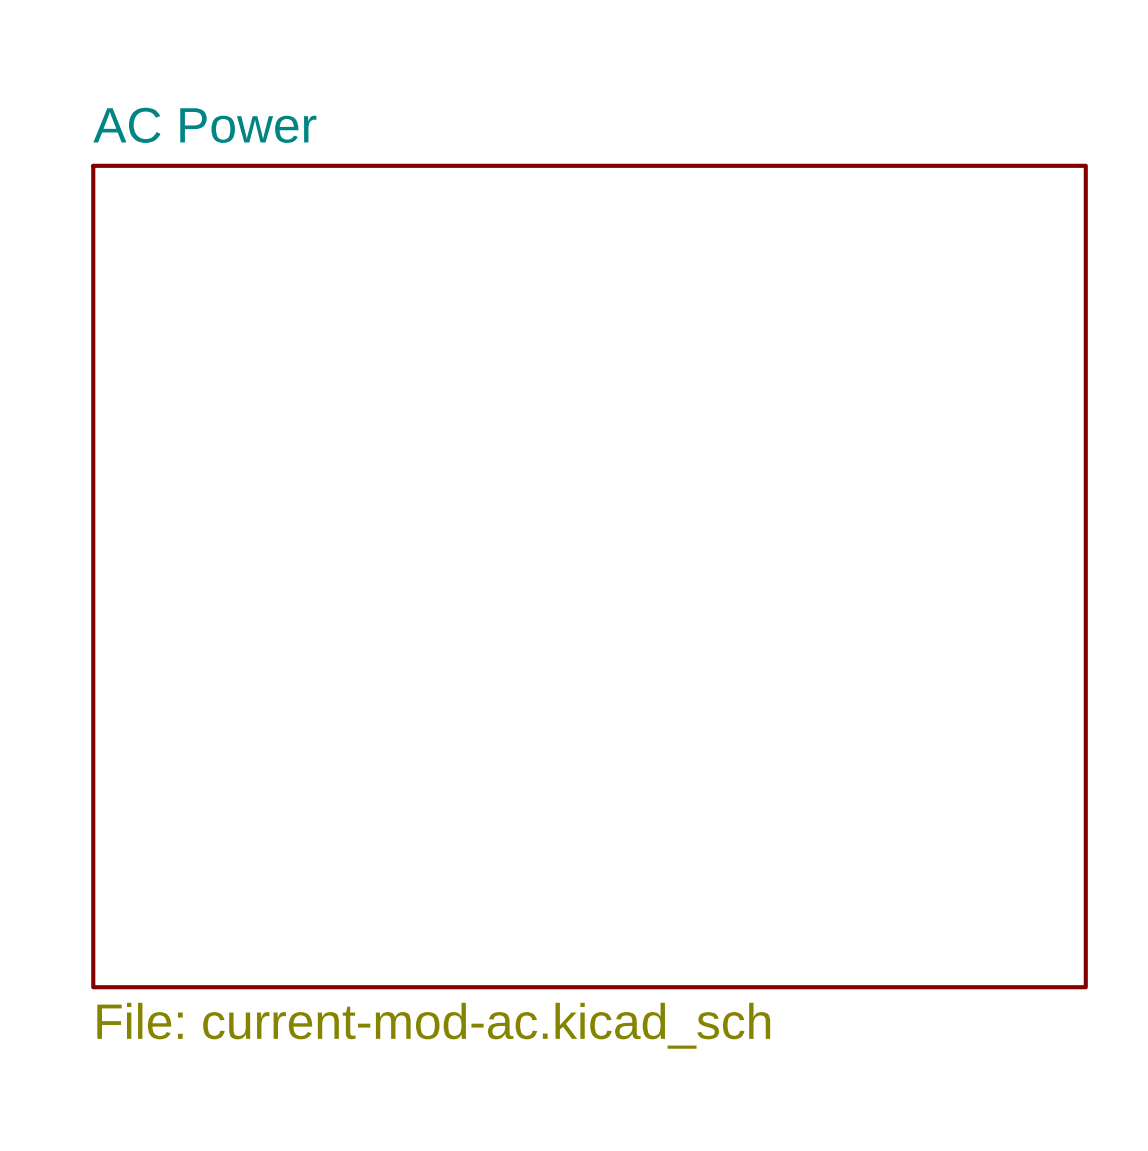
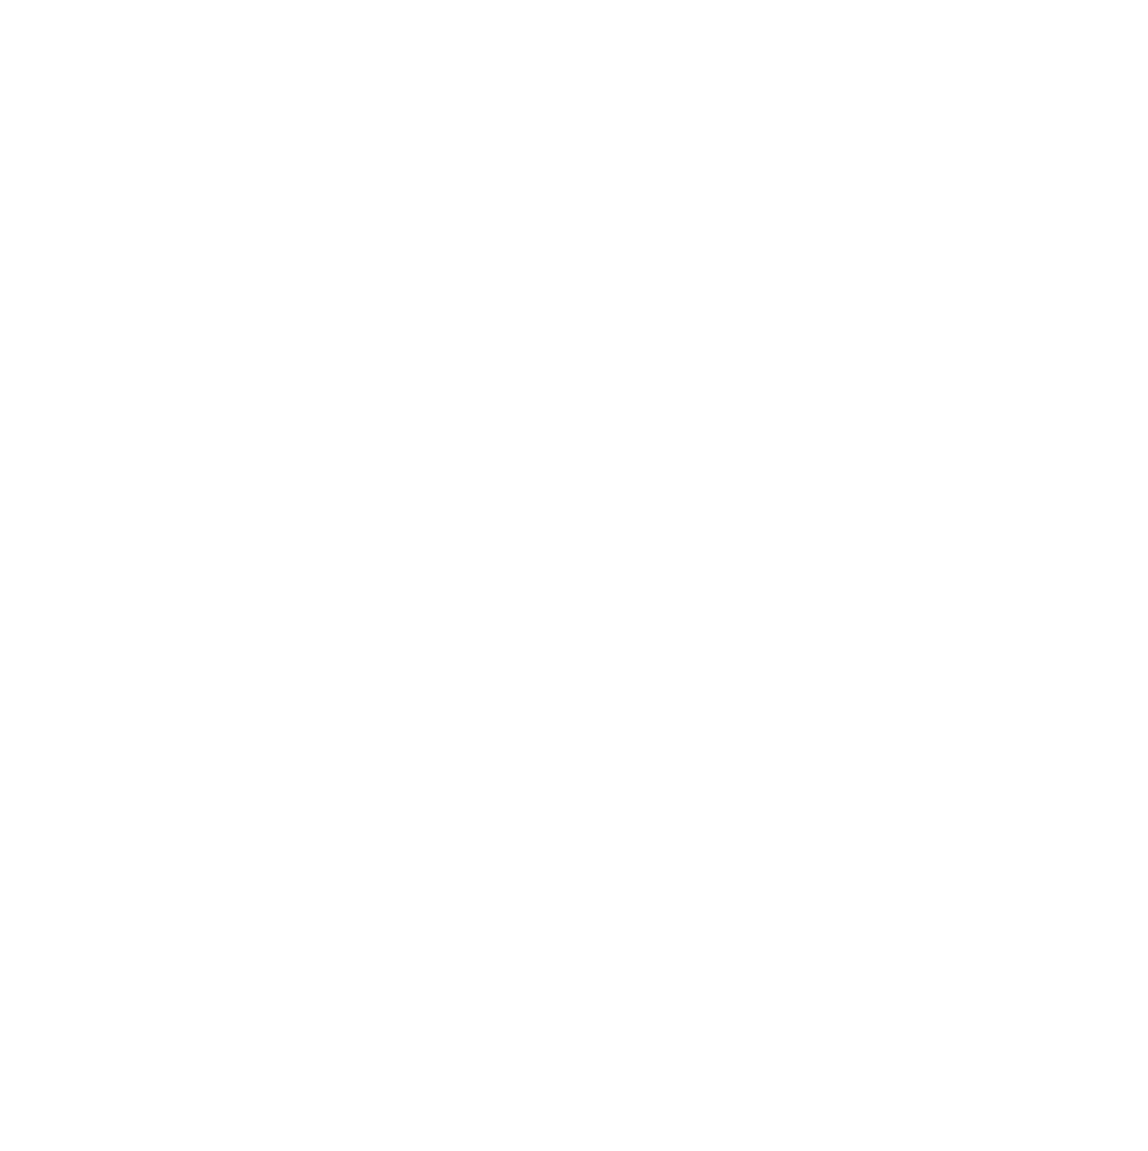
sheet AC Power: File: current-mod-ac.kicad_sch (589, 576) -> none

